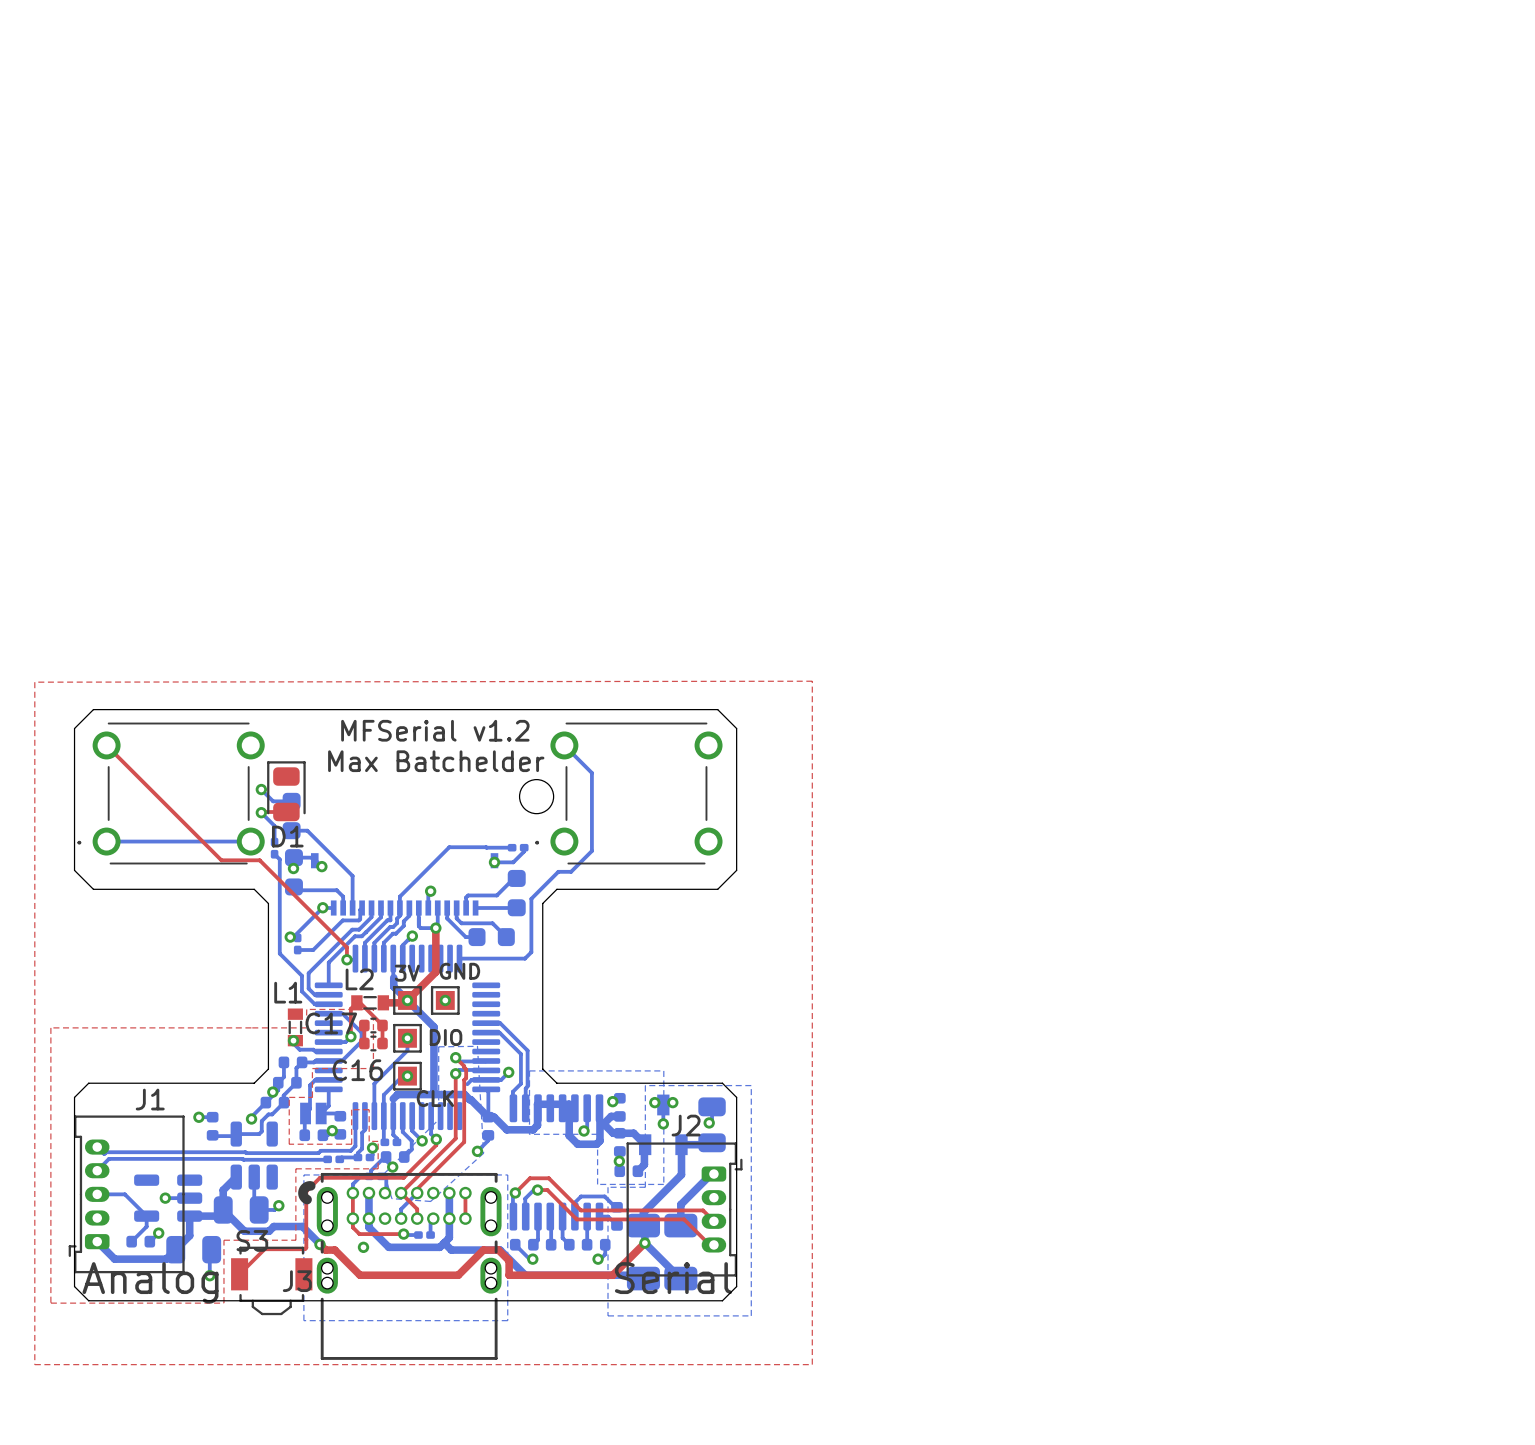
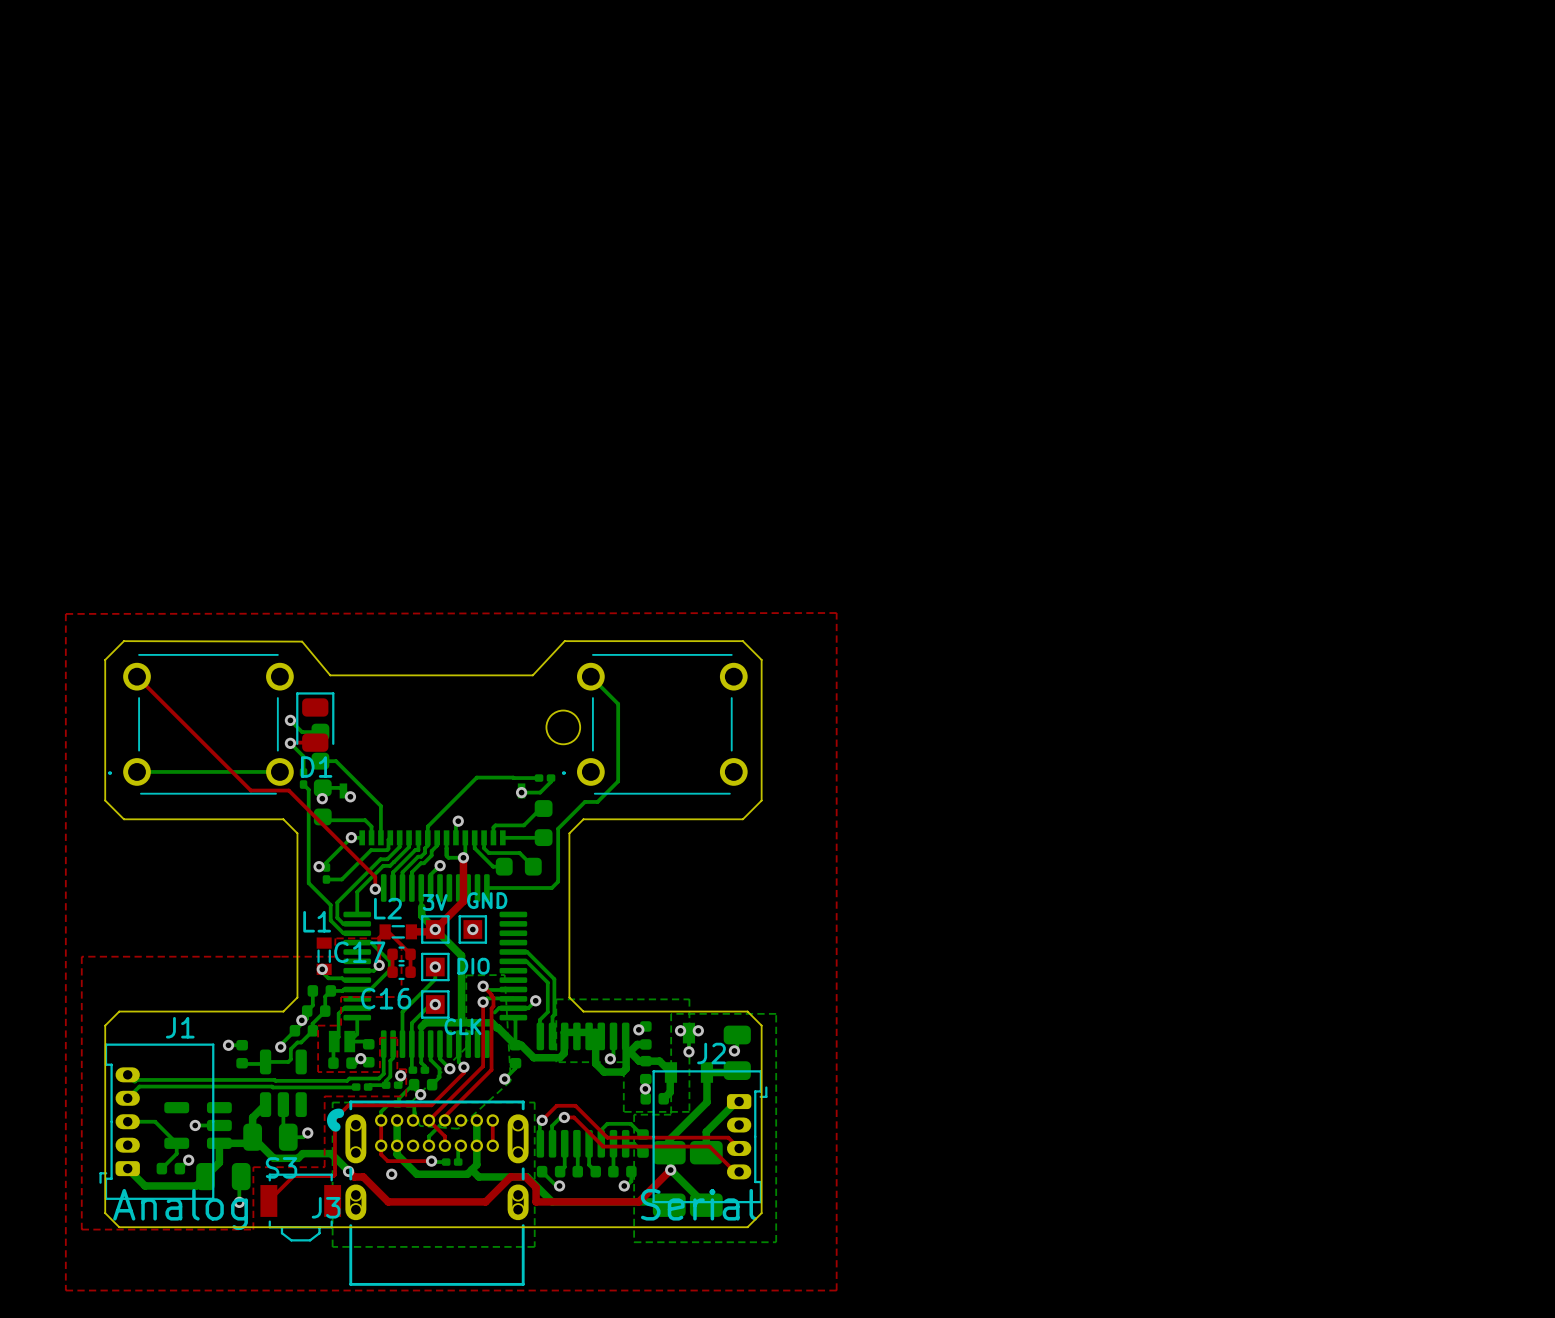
board edge: (93, 709) (538, 709) -> (123, 641) (302, 641) (330, 675) (532, 675) (564, 641)
text: MFSerial v1.2 (435, 730) -> none
text: Max Batchelder (436, 761) -> none

